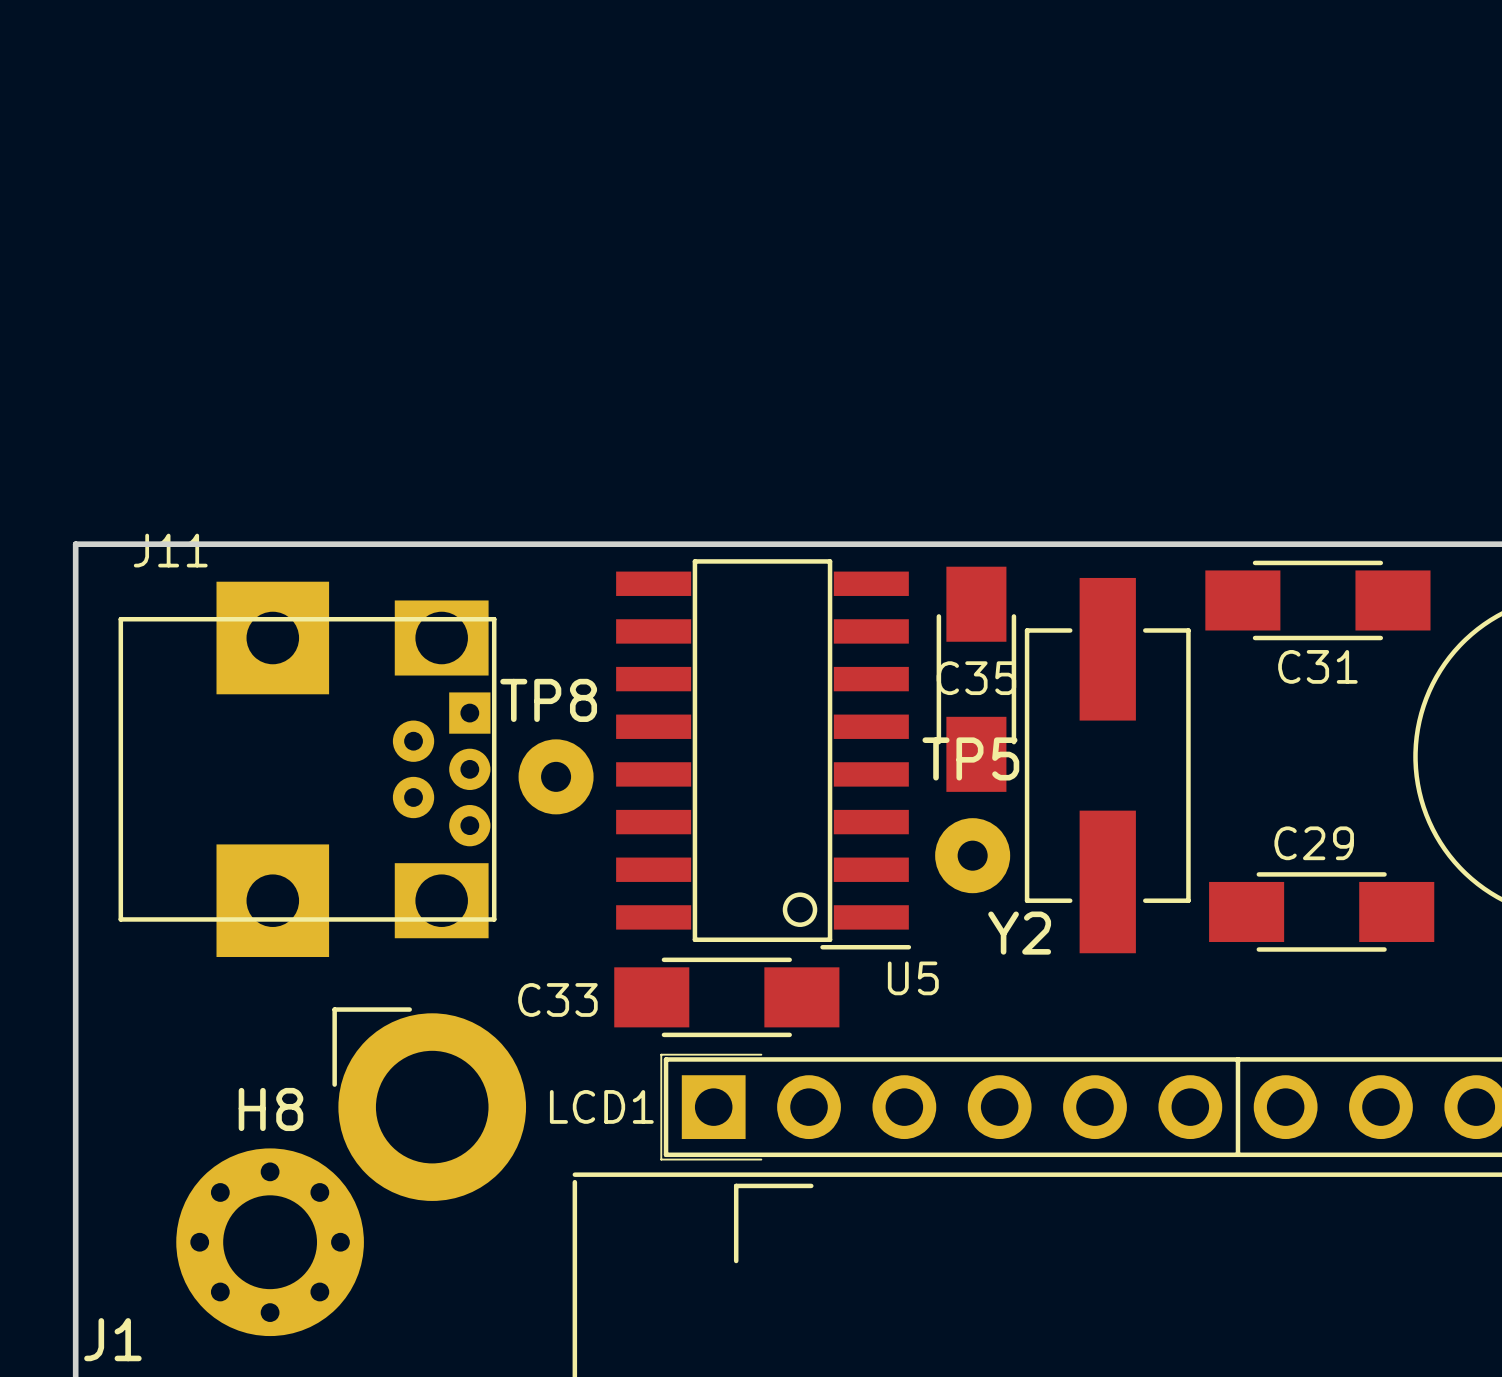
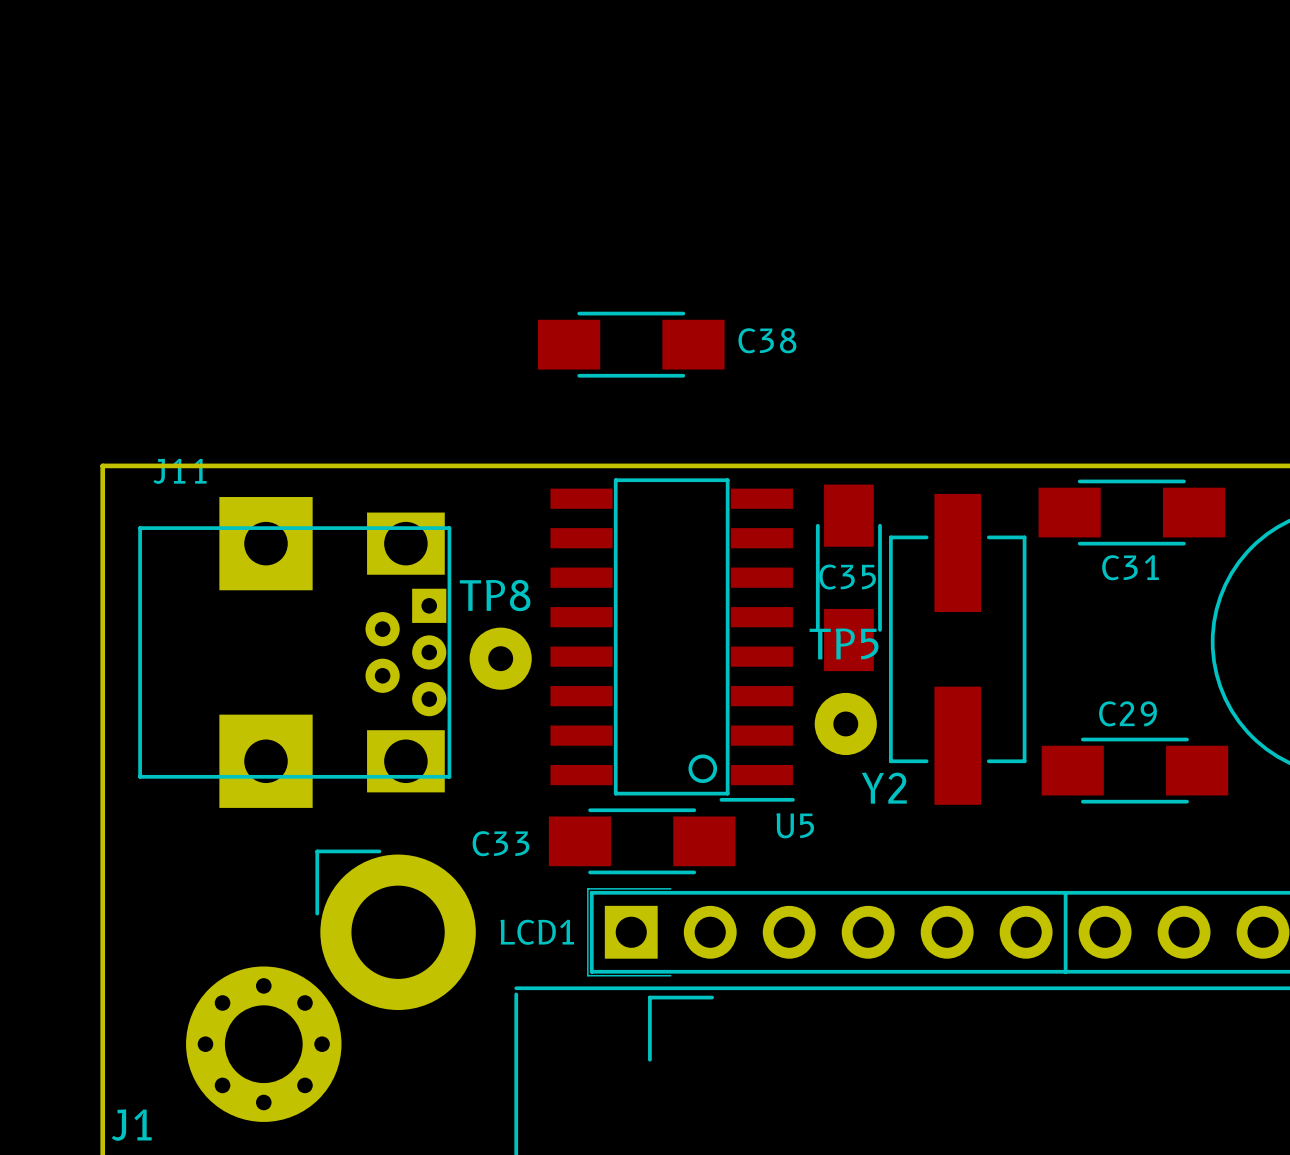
C38: none -> (631, 344)
H8 name: H8 (270, 1109) -> none

